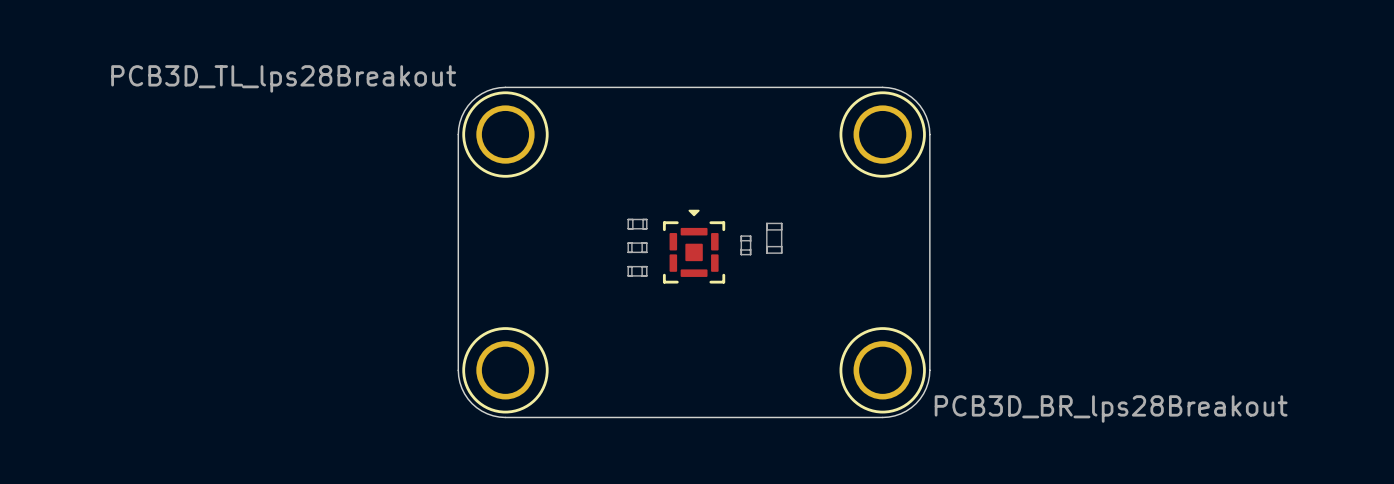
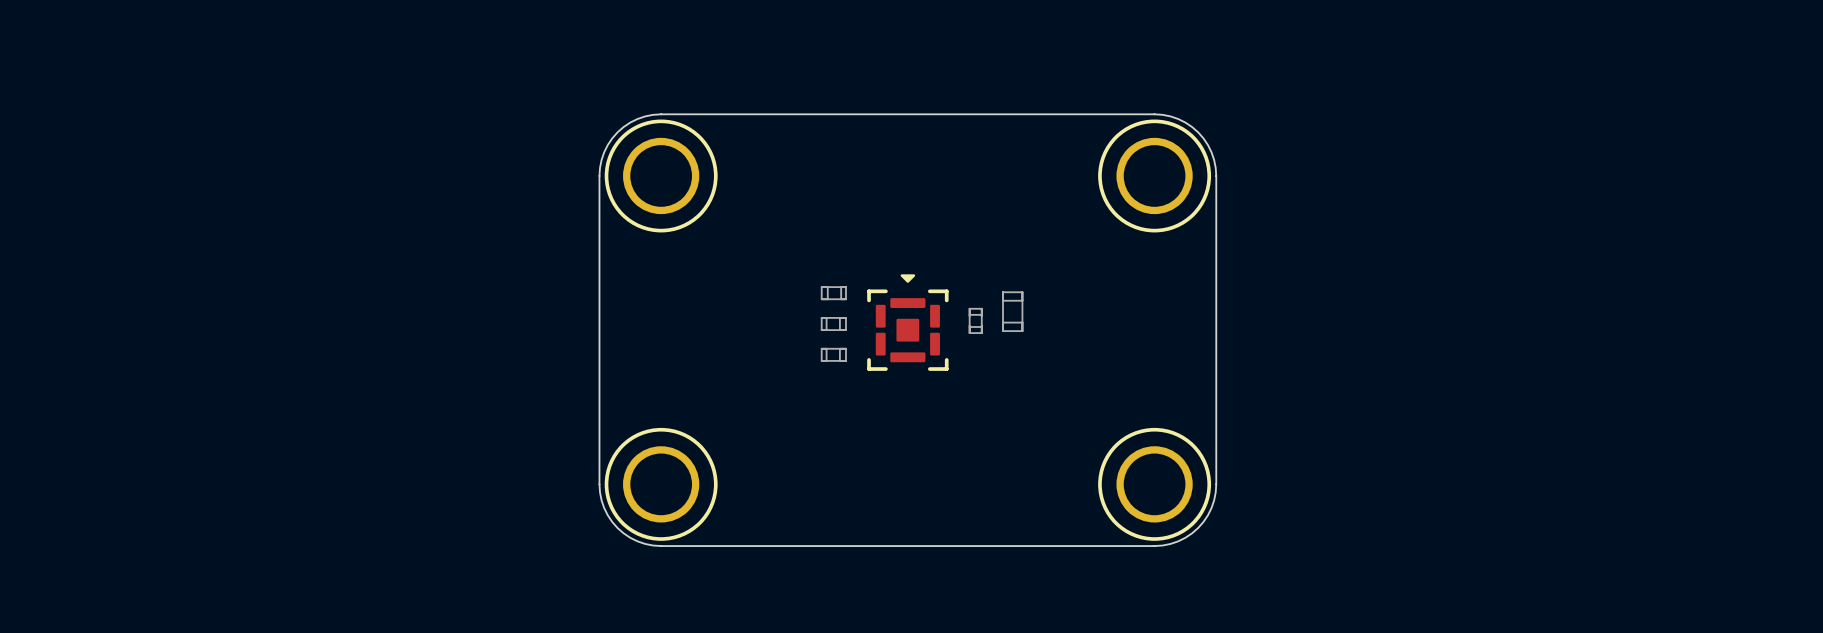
text: PCB3D_TL_lps28Breakout (283, 78) -> none
text: PCB3D_BR_lps28Breakout (1111, 409) -> none

